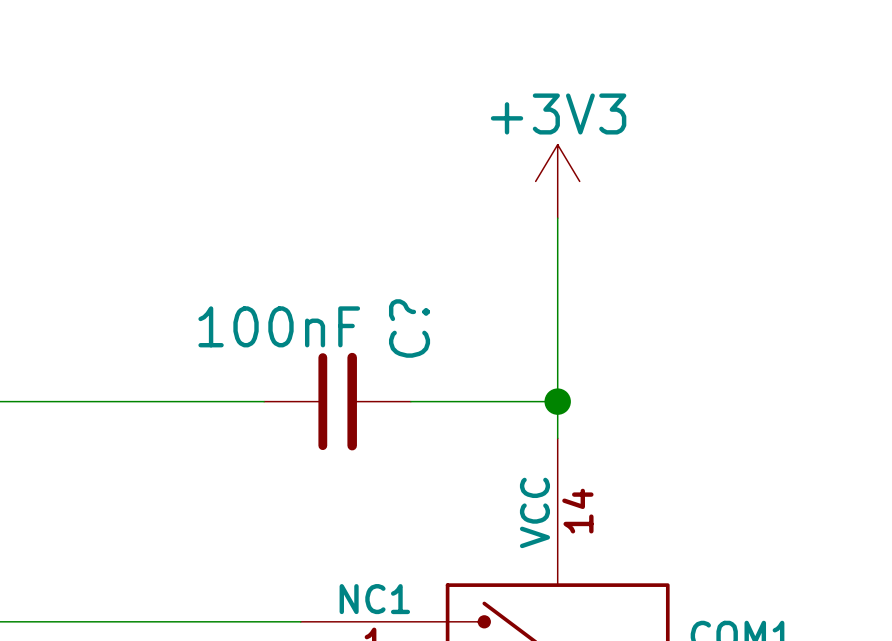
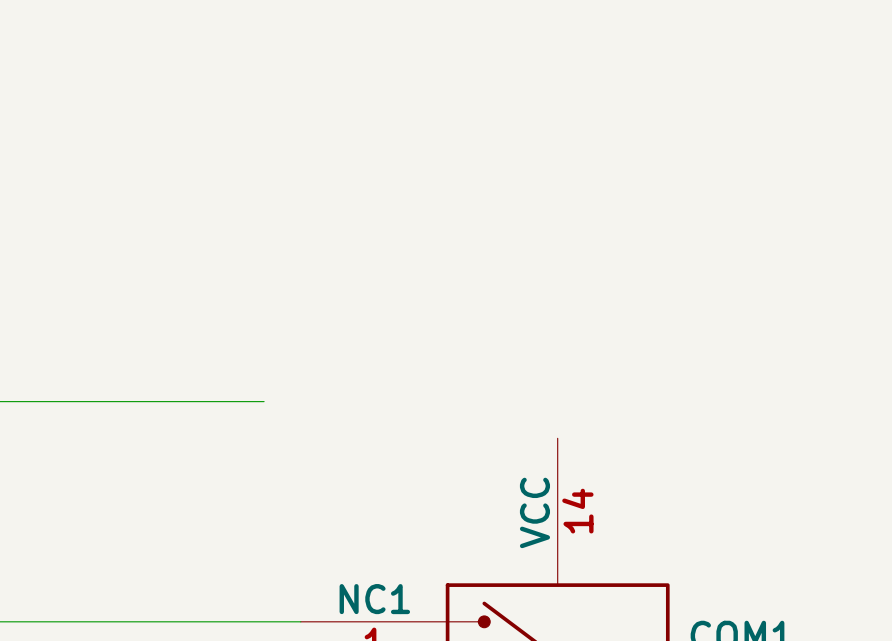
power symbol: +3V3 (557, 181) -> none
wire: (557, 218) (557, 438) -> none
C?: 100nF (337, 401) -> none
wire: (410, 401) (557, 401) -> none
junction: (557, 401) -> none

